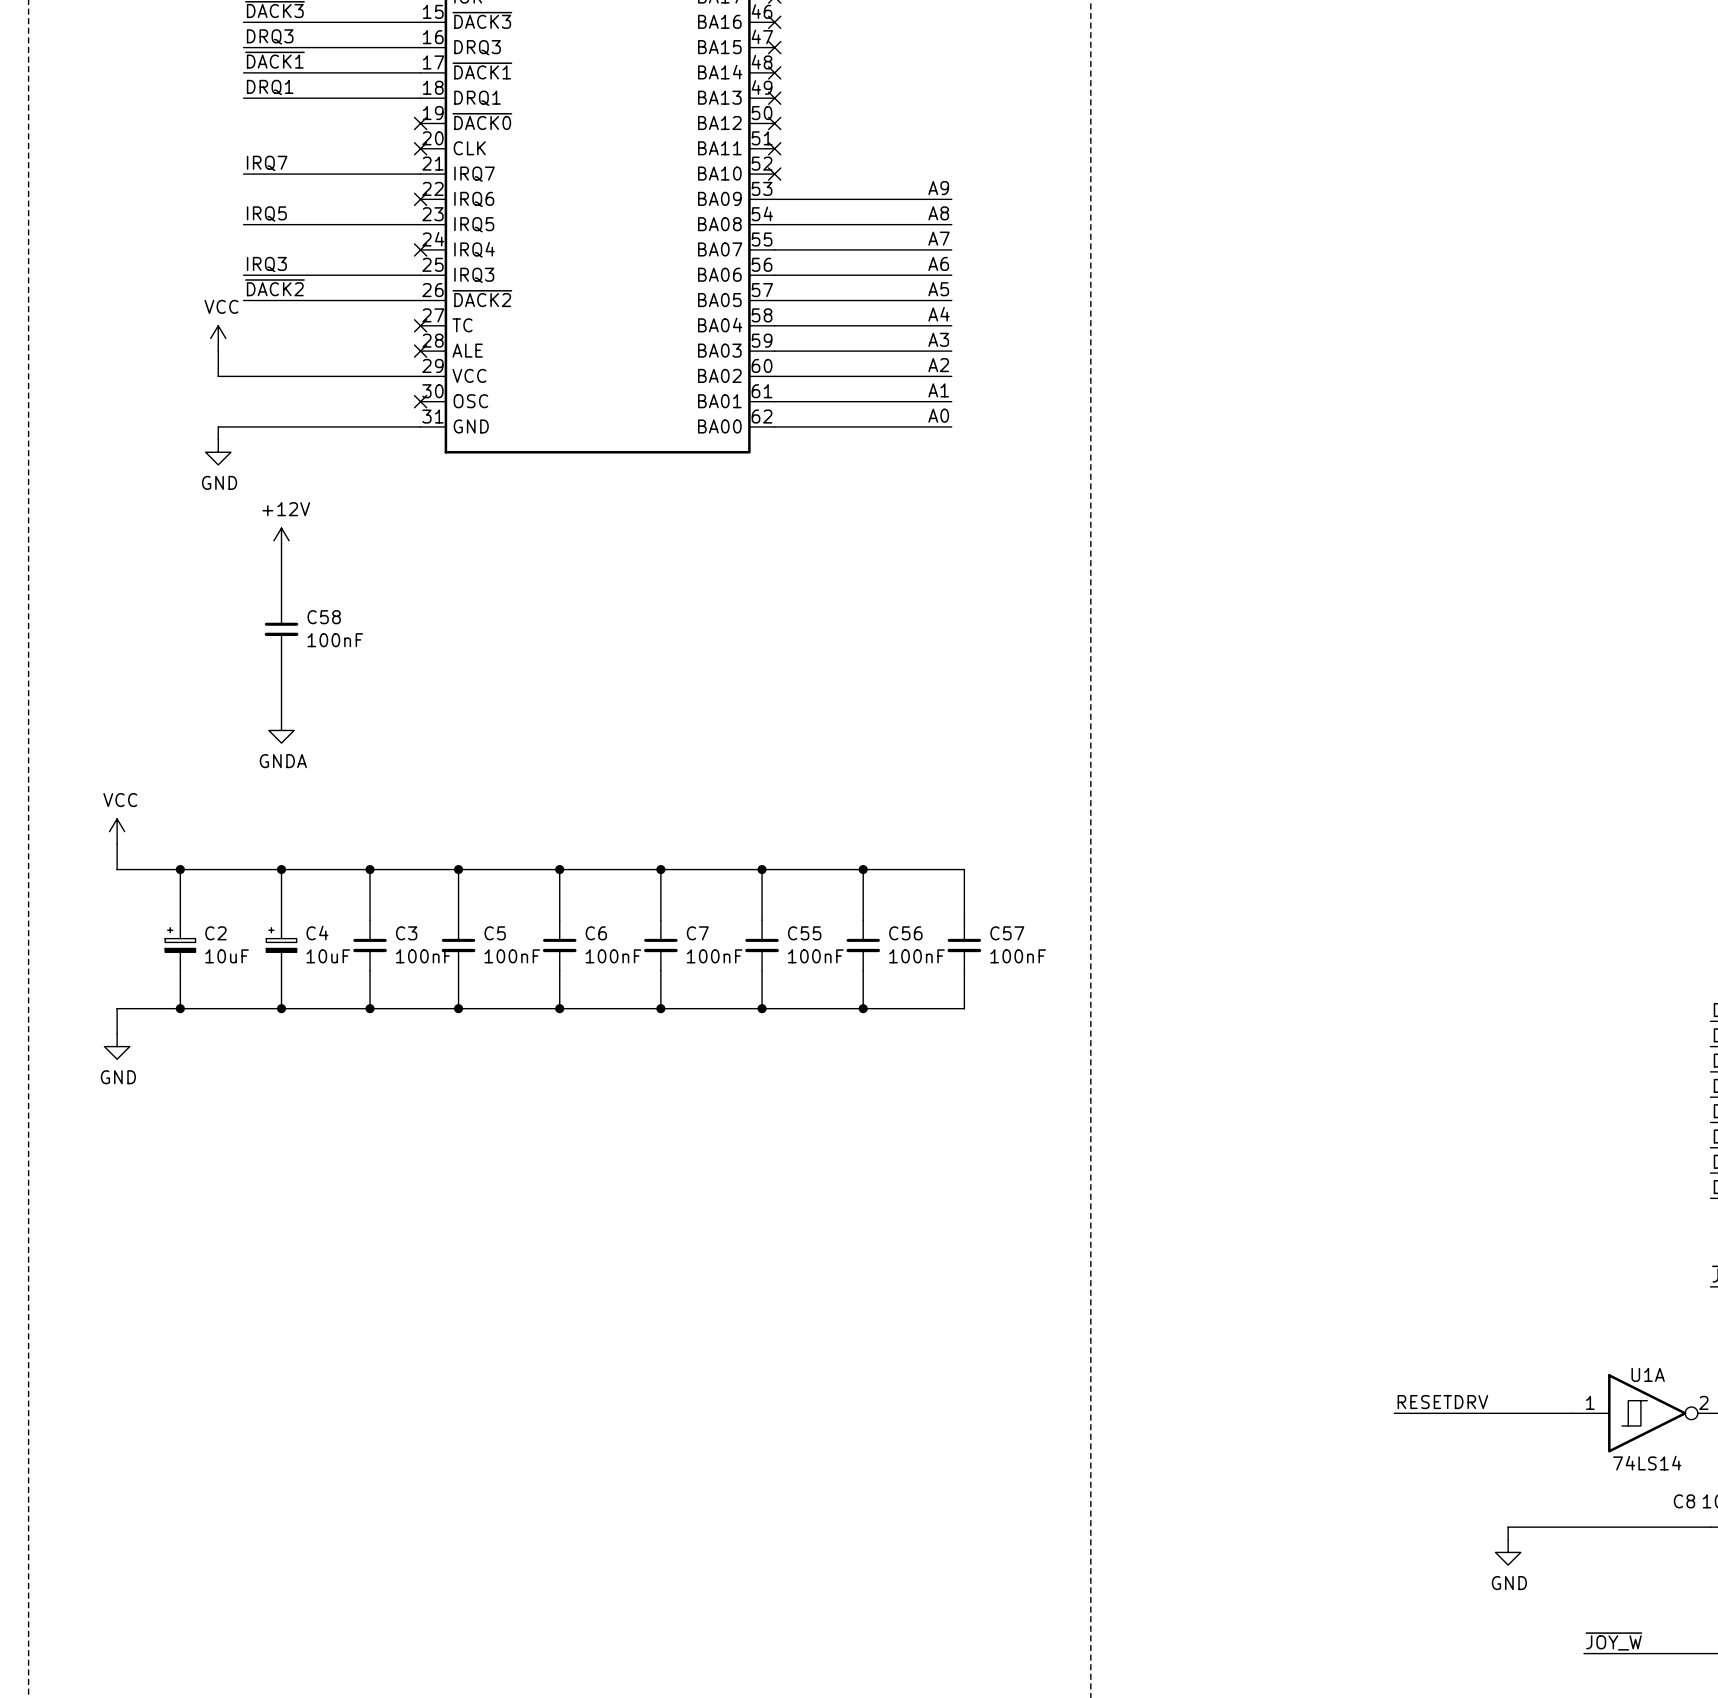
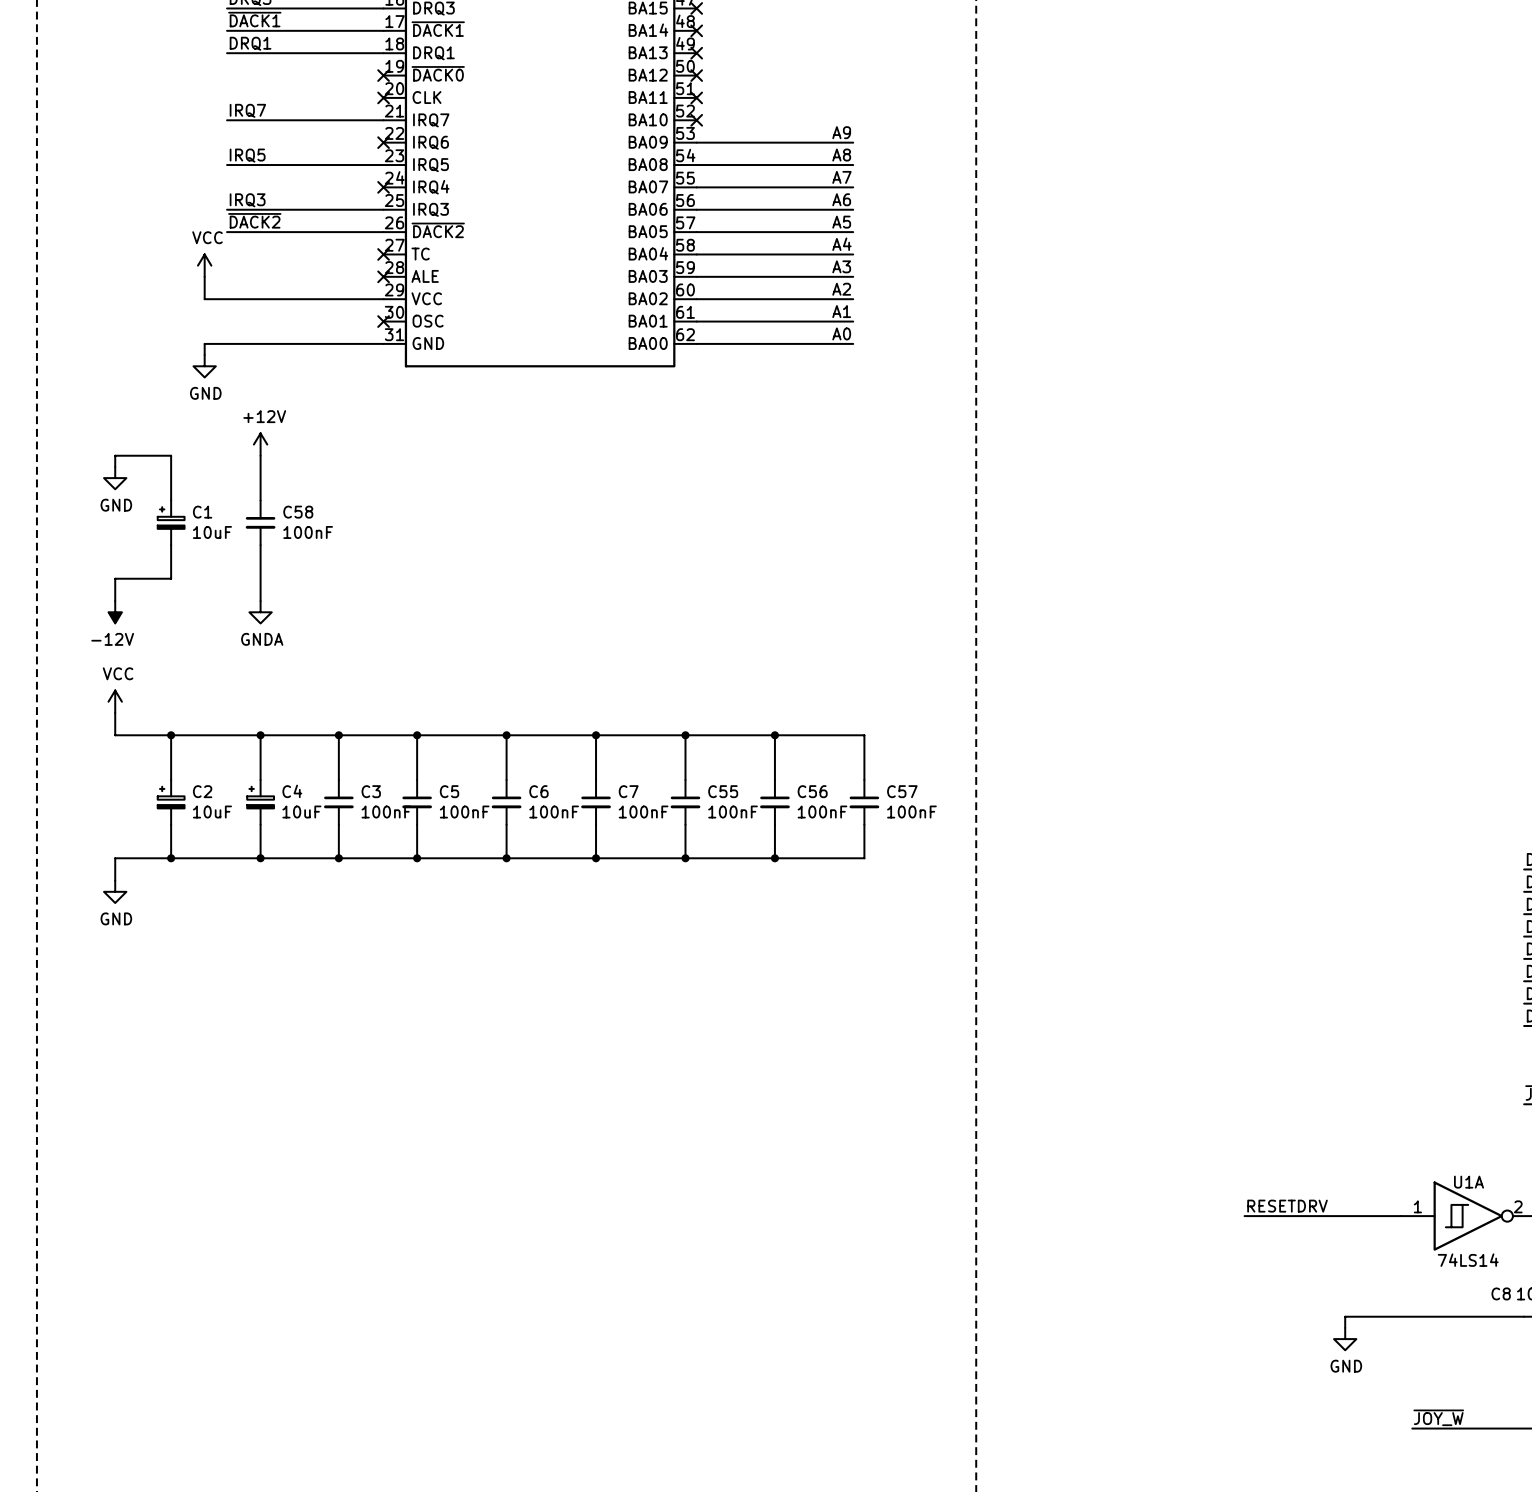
wire: none -> (115, 466) (115, 455) (171, 455) (171, 500)
power symbol: none -> GND (115, 478)
C1: none -> 10uF (171, 522)
wire: none -> (171, 545) (171, 578) (115, 578) (115, 601)
power symbol: none -> -12V (115, 612)

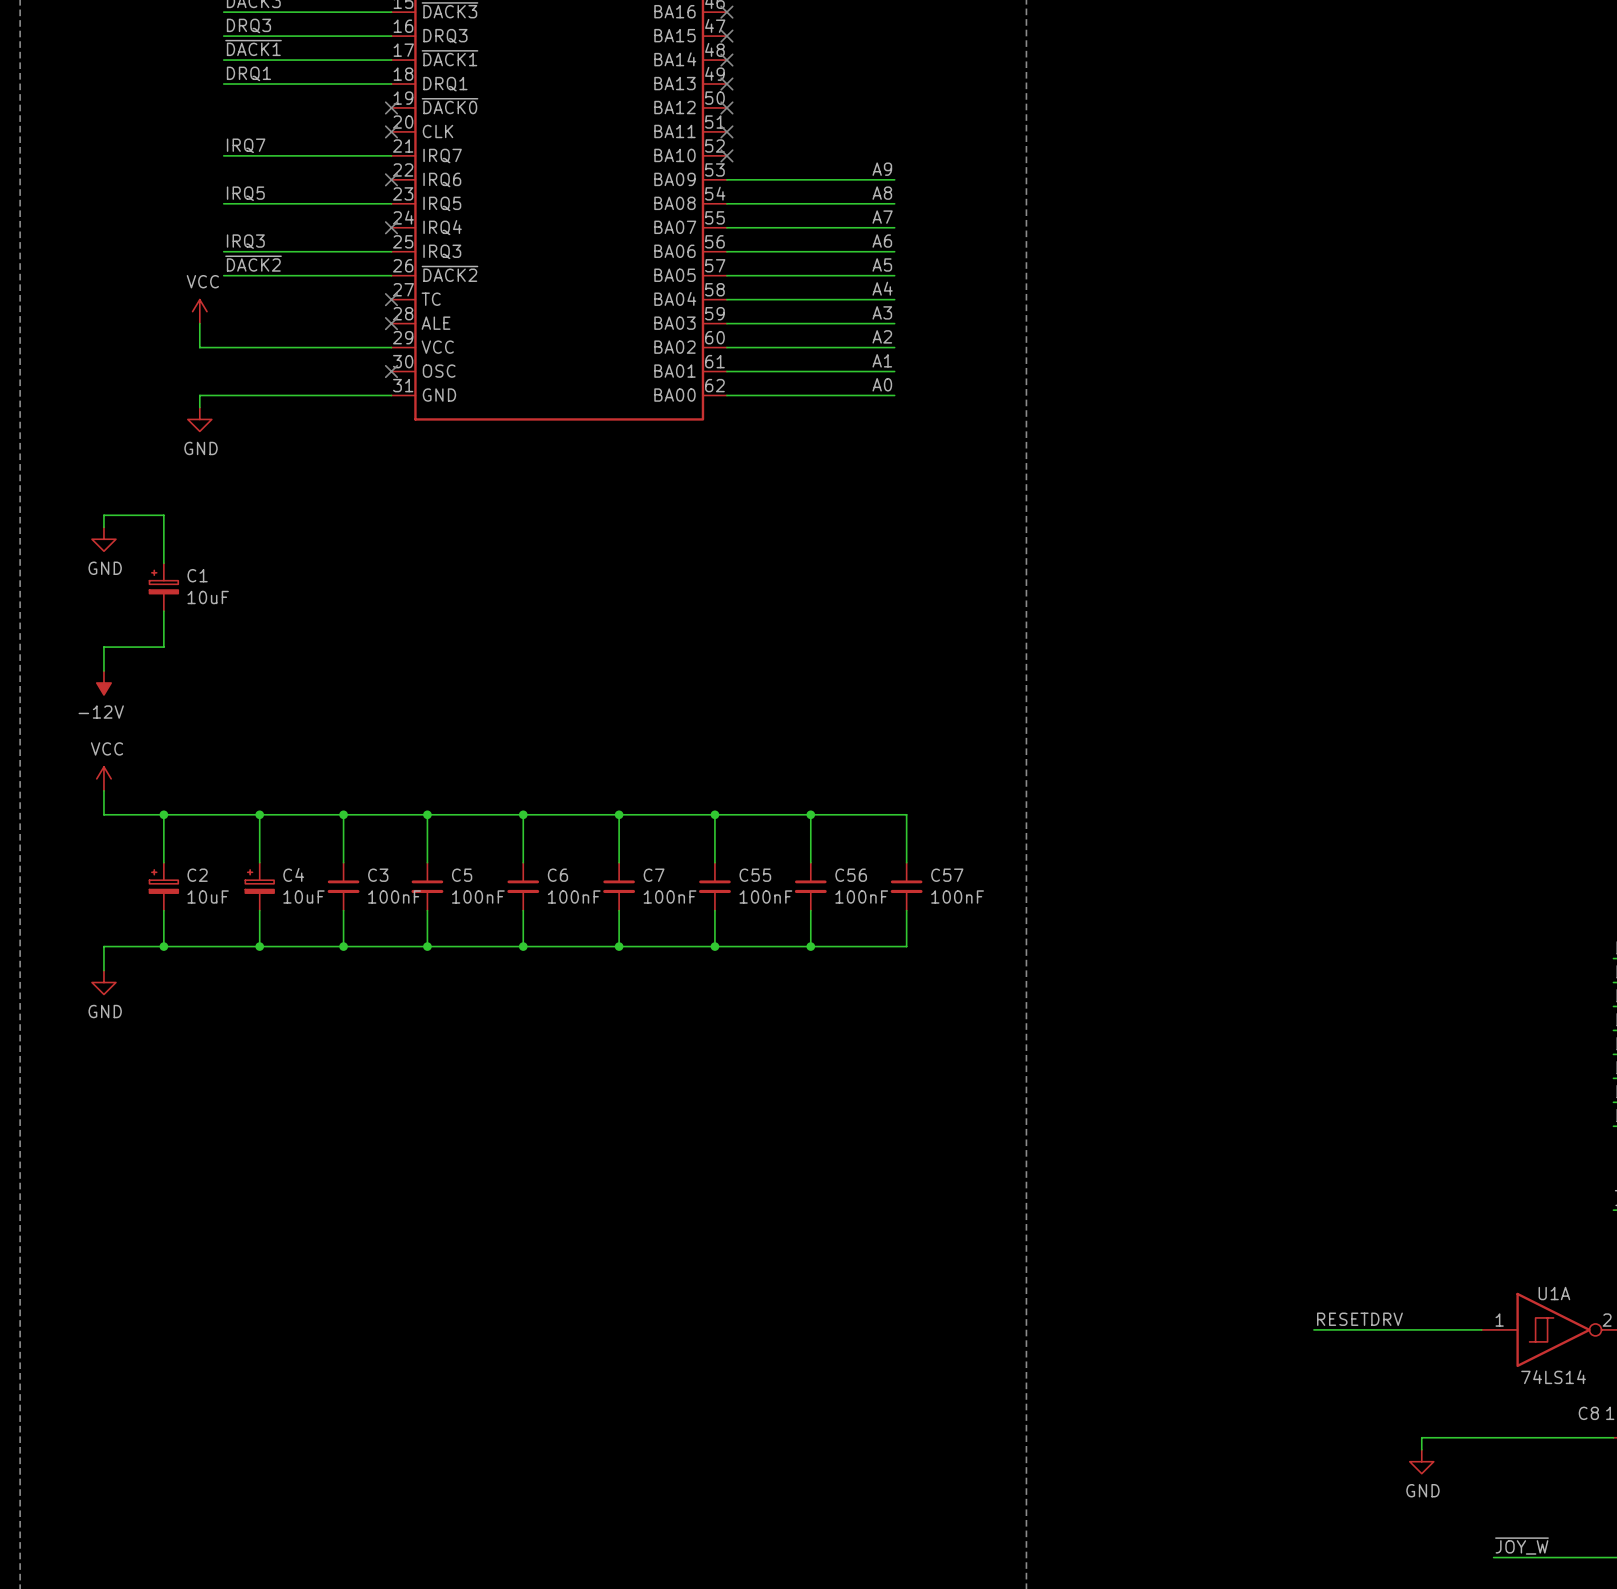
power symbol: +12V (260, 444) -> none
wire: (260, 455) (260, 500) -> none
C58: 100nF (260, 522) -> none
wire: (260, 545) (260, 601) -> none
power symbol: GNDA (260, 612) -> none

